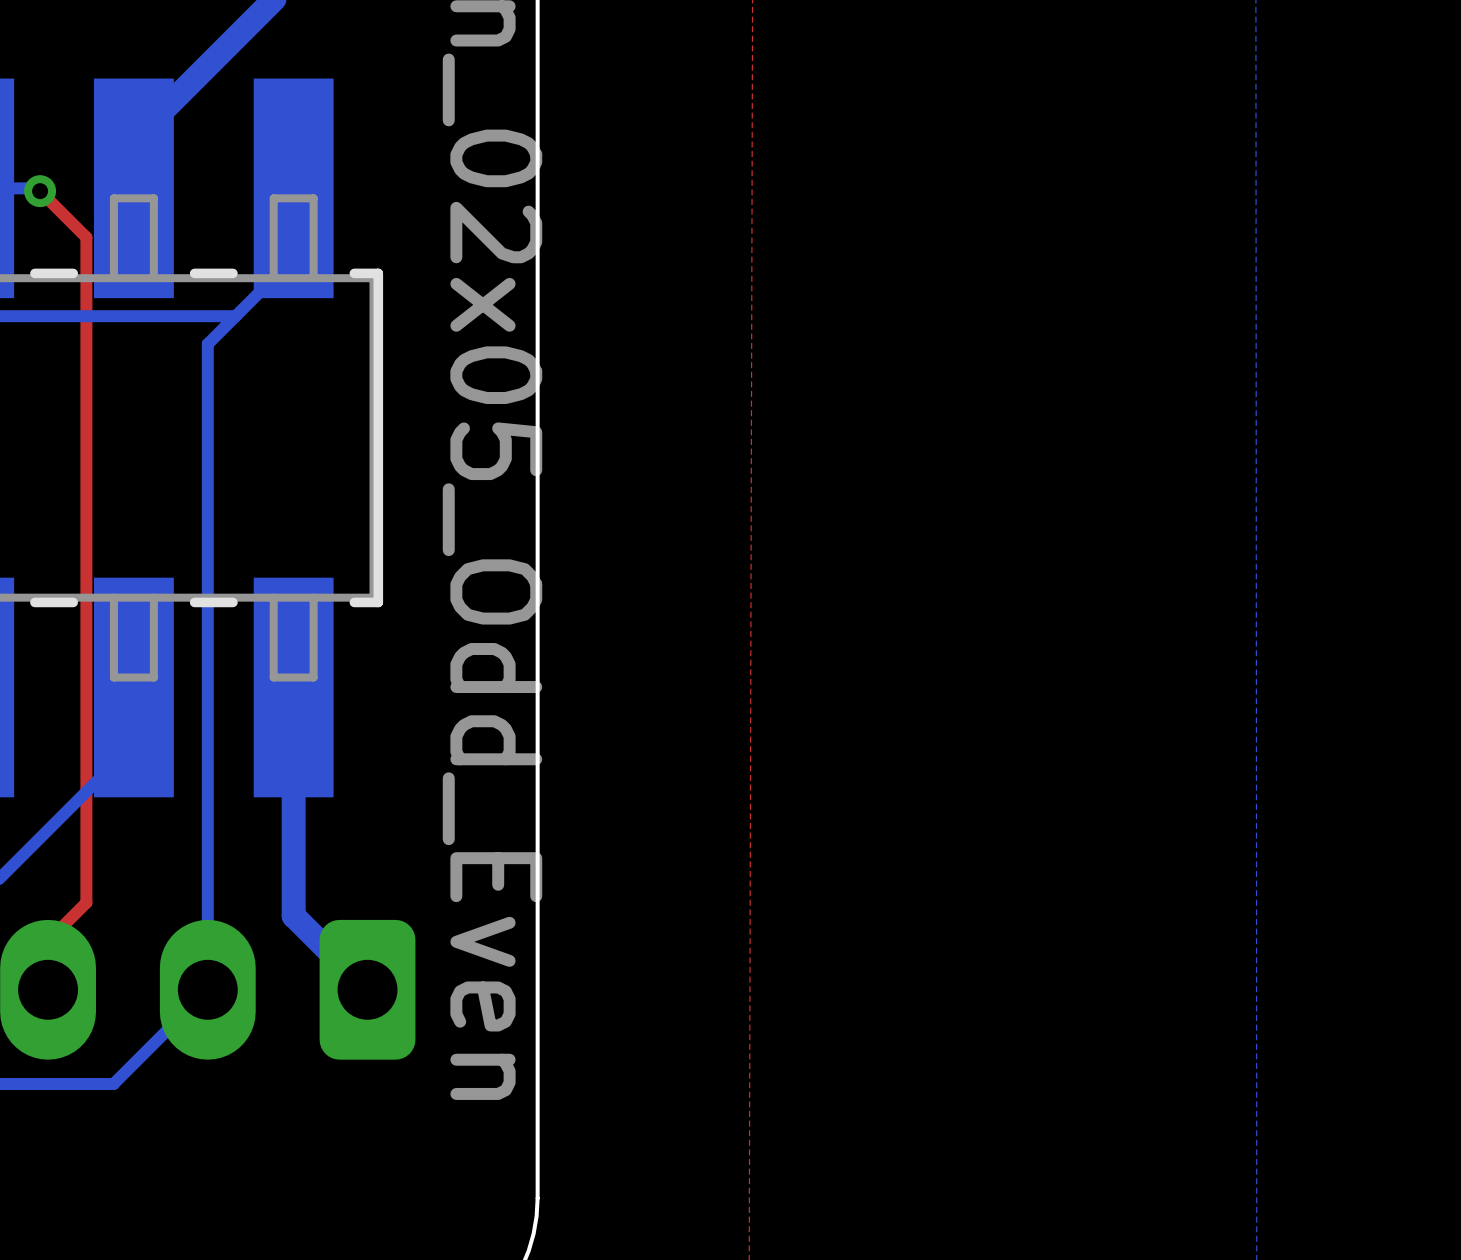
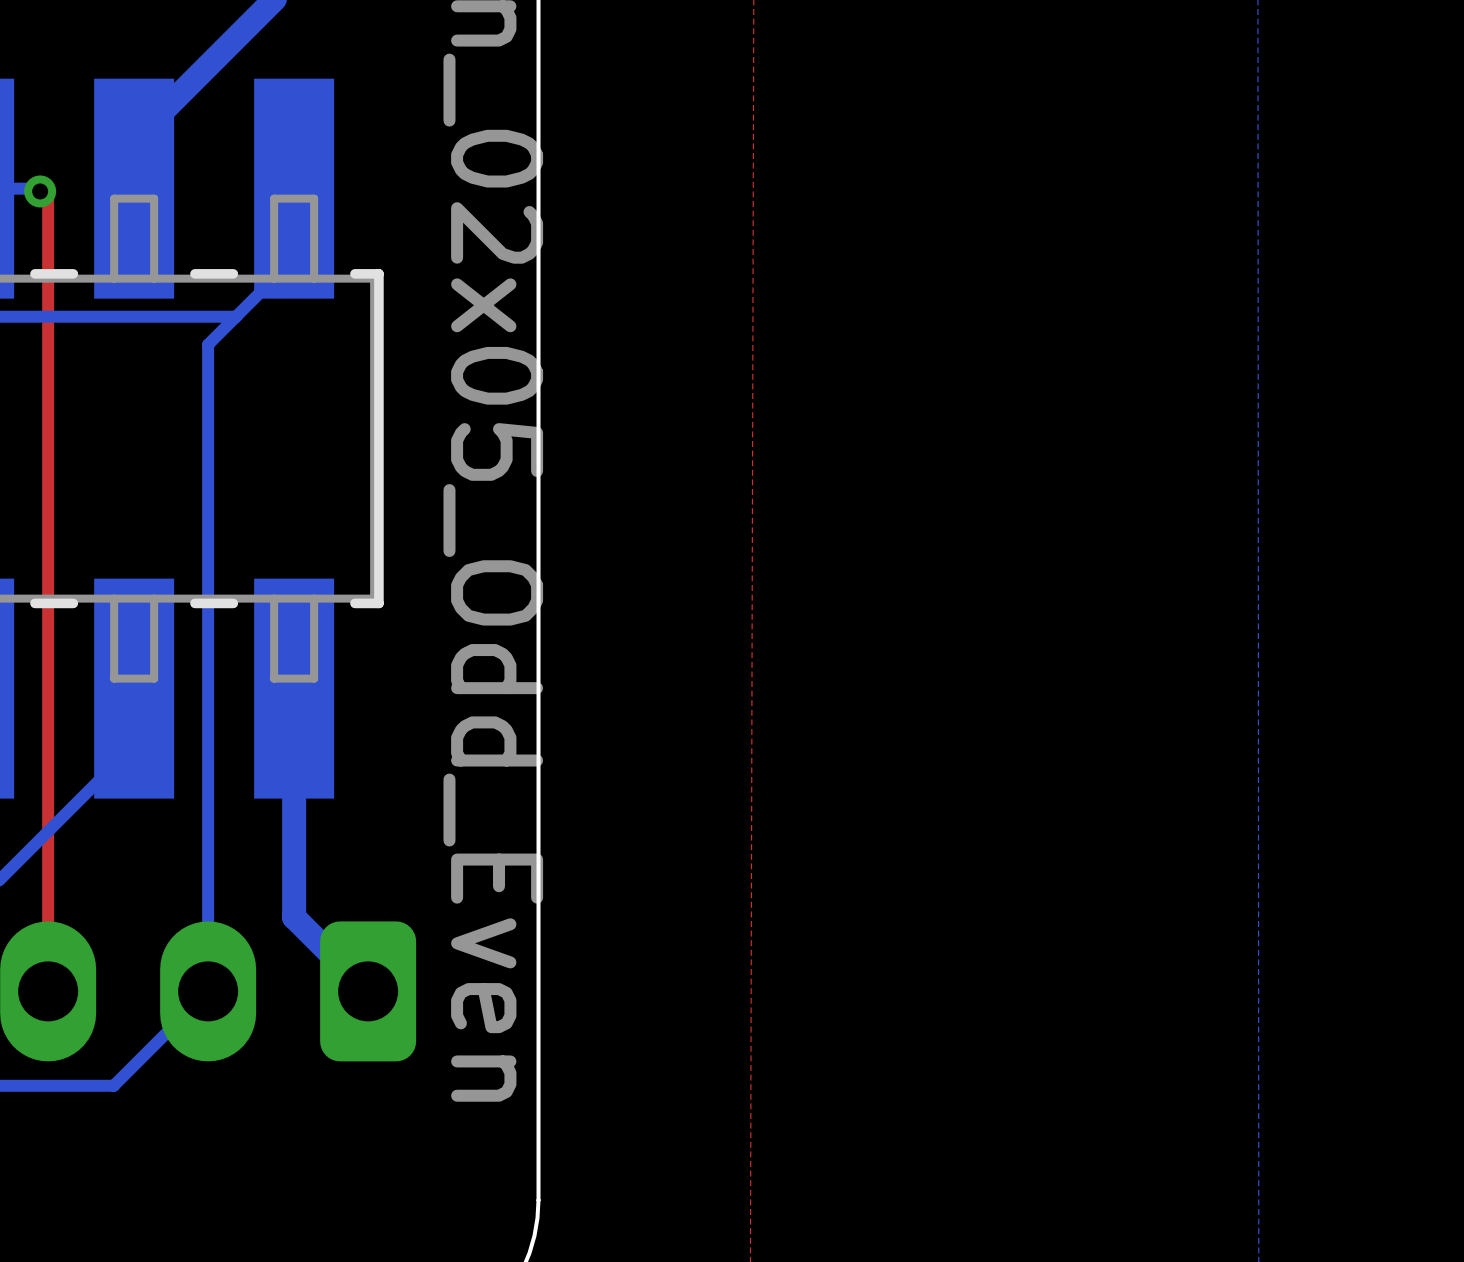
top track: (48, 199) (86, 237) (86, 902) (48, 941) -> (48, 199) (48, 942)

